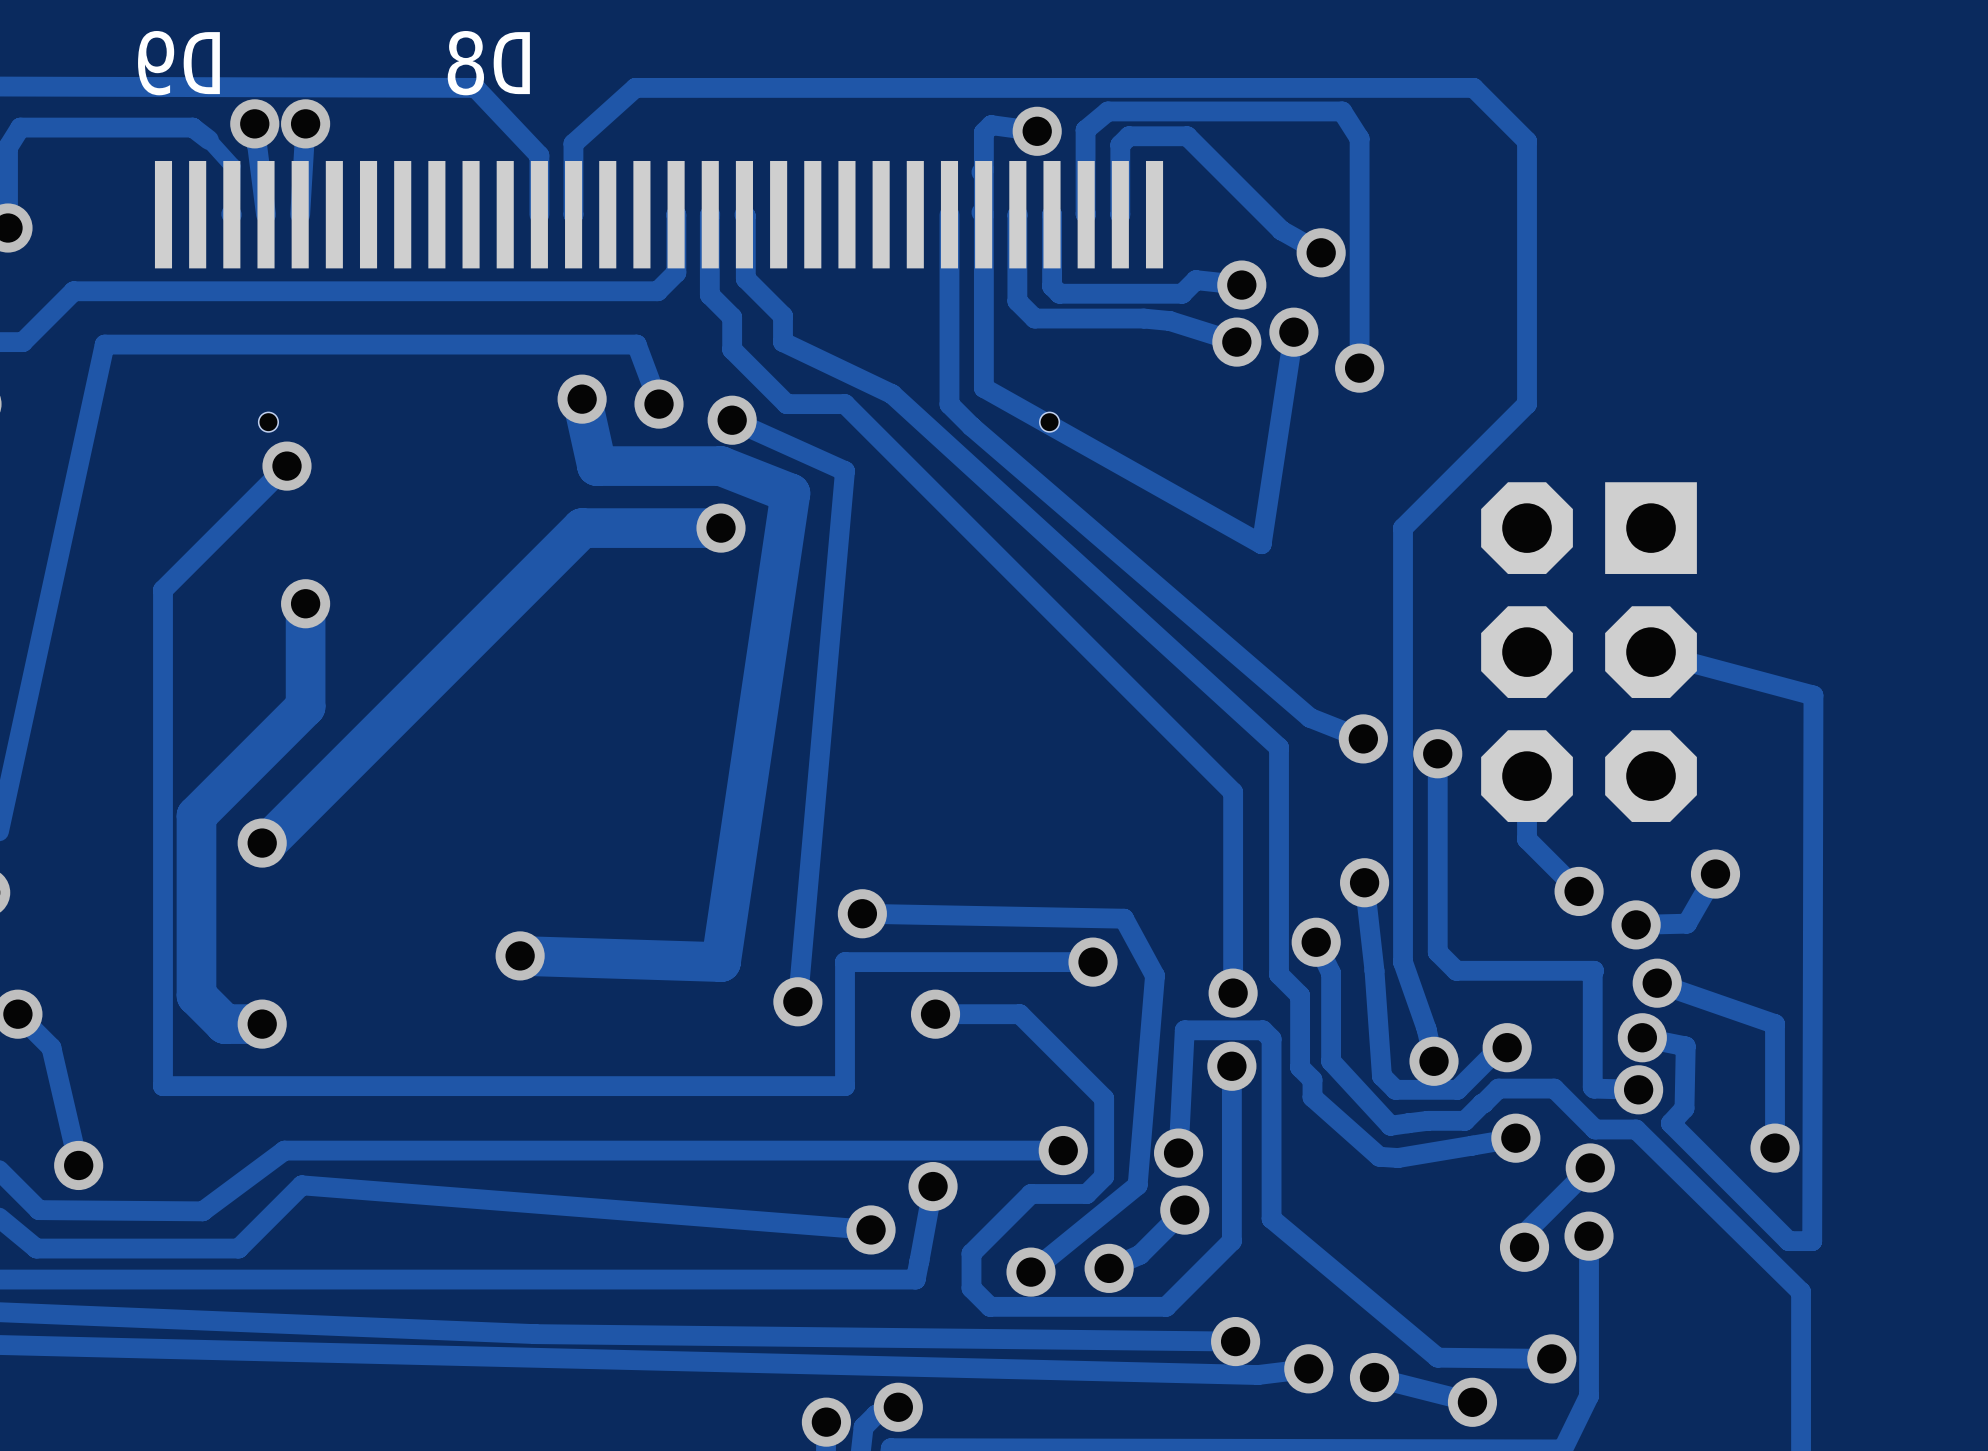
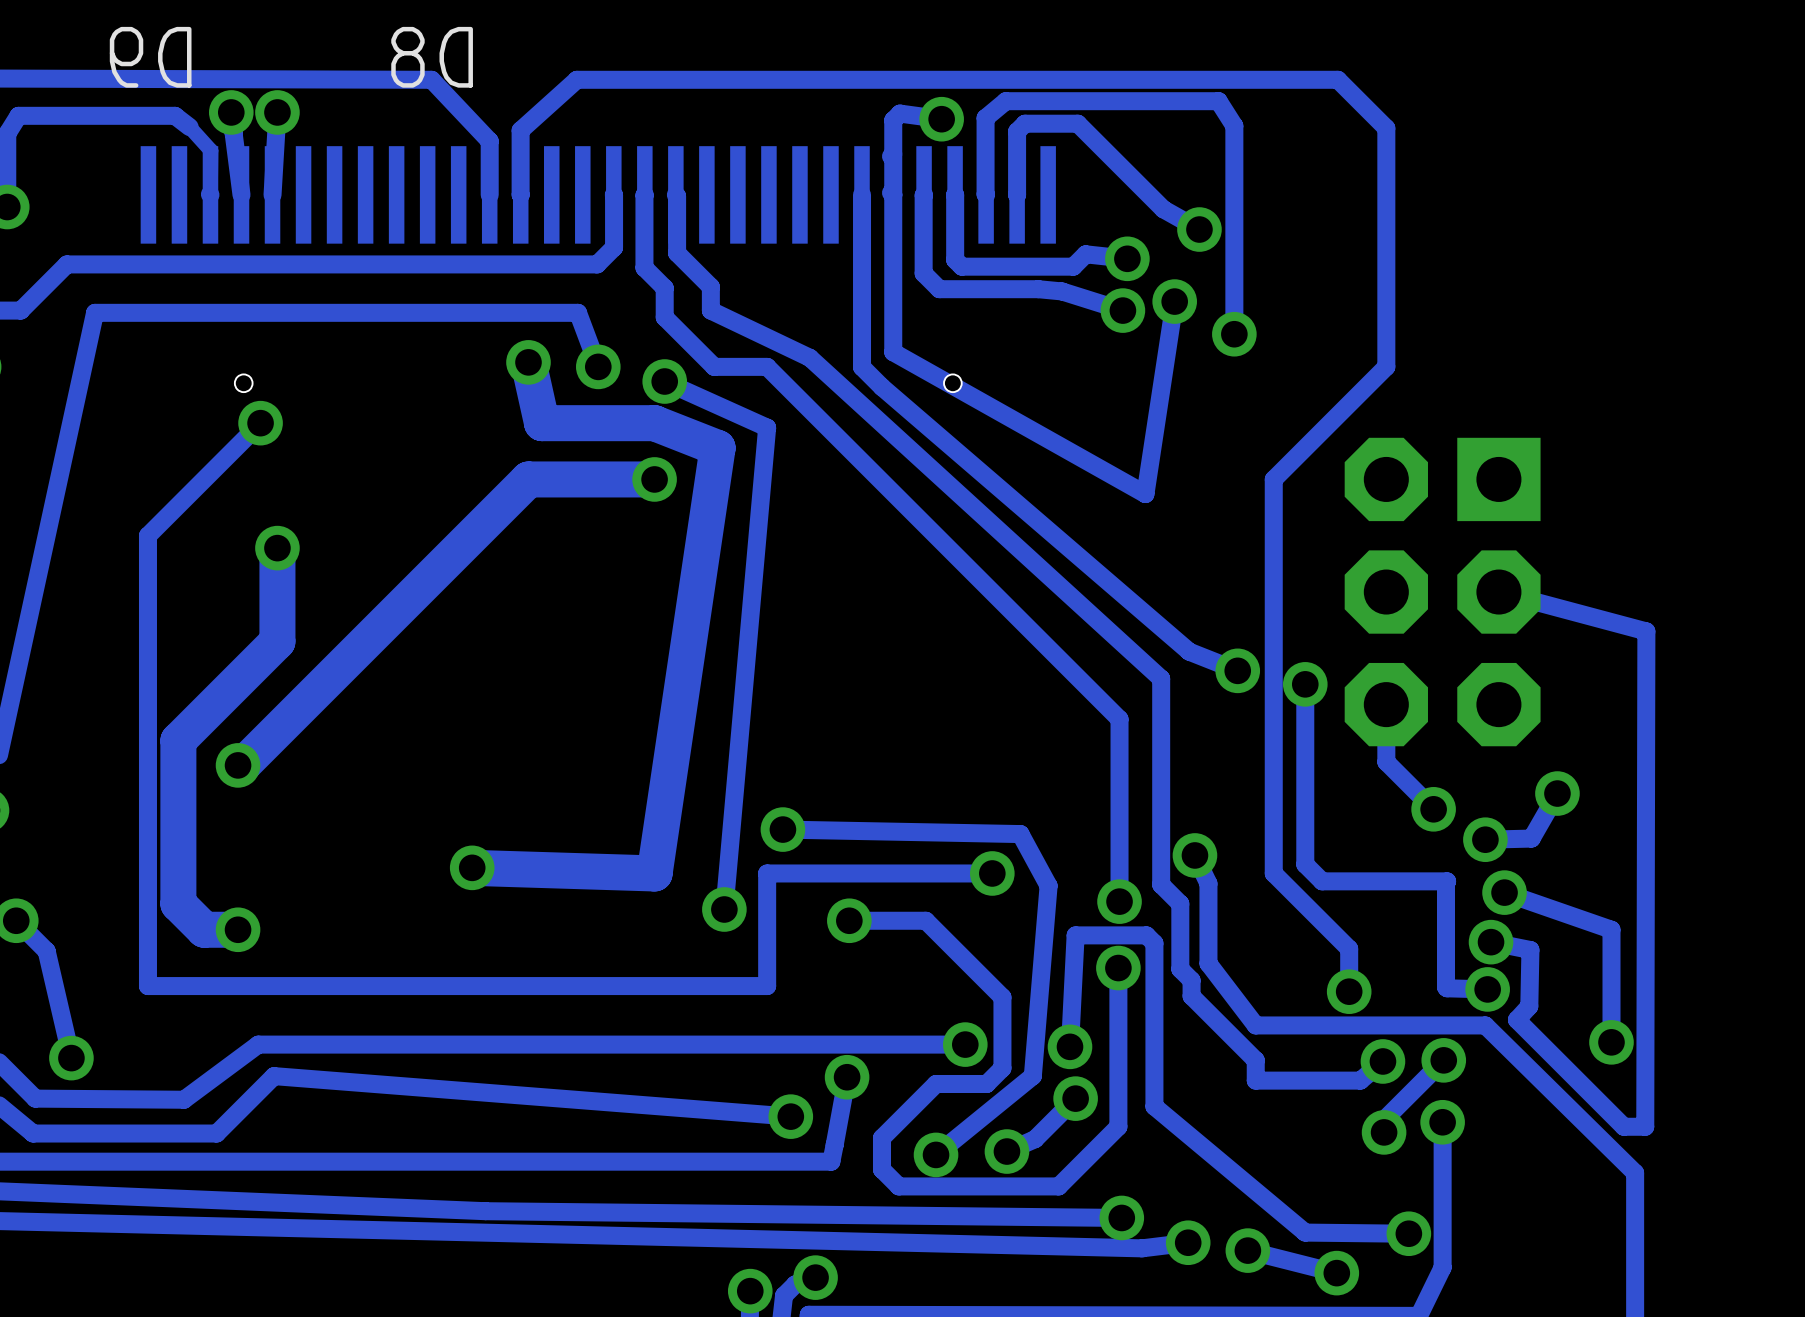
track: (1364, 882) (1374, 970) (1381, 1076) (1395, 1089) (1457, 1089) (1494, 1052) (1507, 1047) -> none
via: (1364, 882) -> none
track: (1403, 962) (1426, 1029) (1434, 1061) -> (1273, 873) (1349, 948) (1349, 991)
via: (1507, 1047) -> none
track: (1331, 1061) (1390, 1125) (1427, 1120) (1465, 1120) (1498, 1088) (1554, 1088) (1595, 1129) -> (1208, 963) (1255, 1025) (1448, 1025)
via: (1434, 1061) -> none
via: none -> (1349, 991)
track: (1312, 1097) (1379, 1156) (1398, 1158) (1515, 1138) -> (1191, 996) (1255, 1060) (1255, 1080) (1360, 1080) (1382, 1061)
via: (1515, 1138) -> none
via: none -> (1382, 1061)

